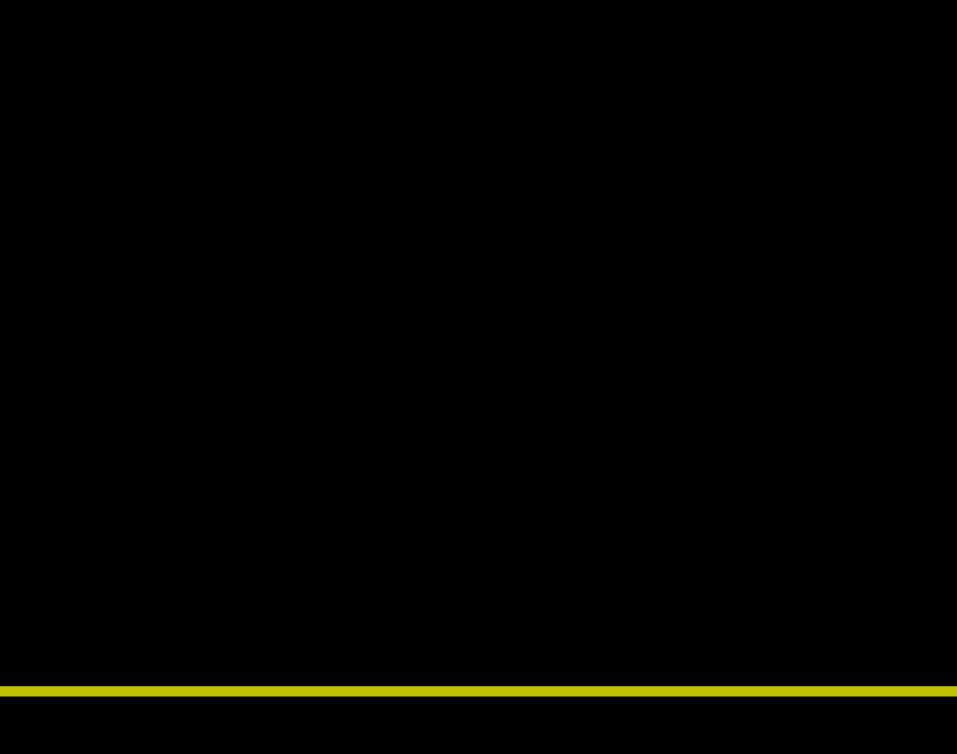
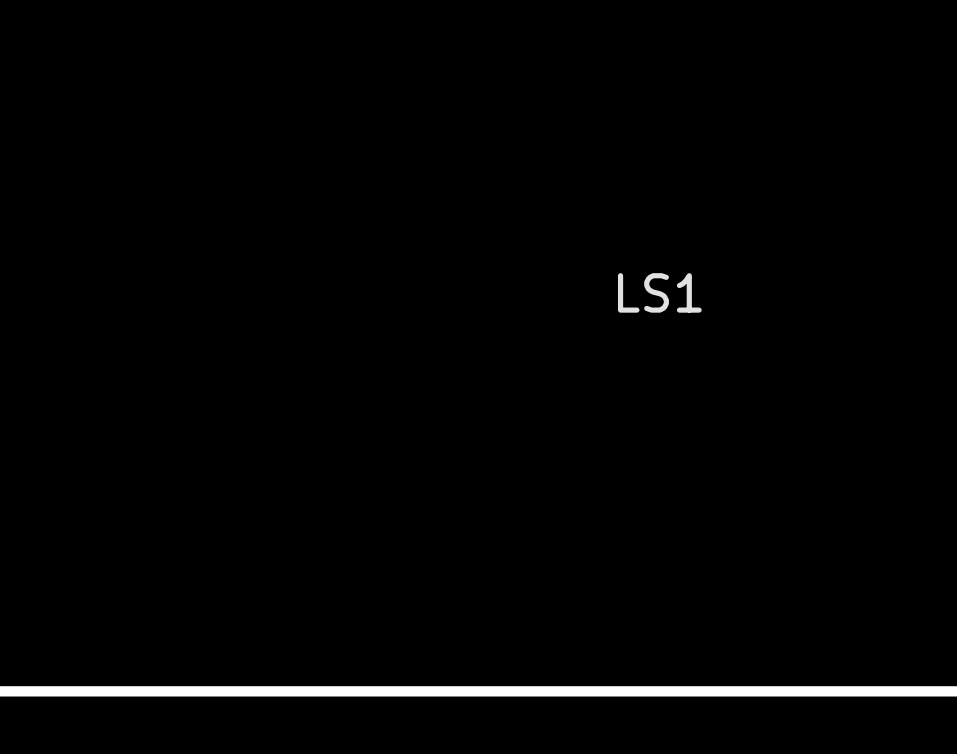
LS1: none -> (659, 292)

